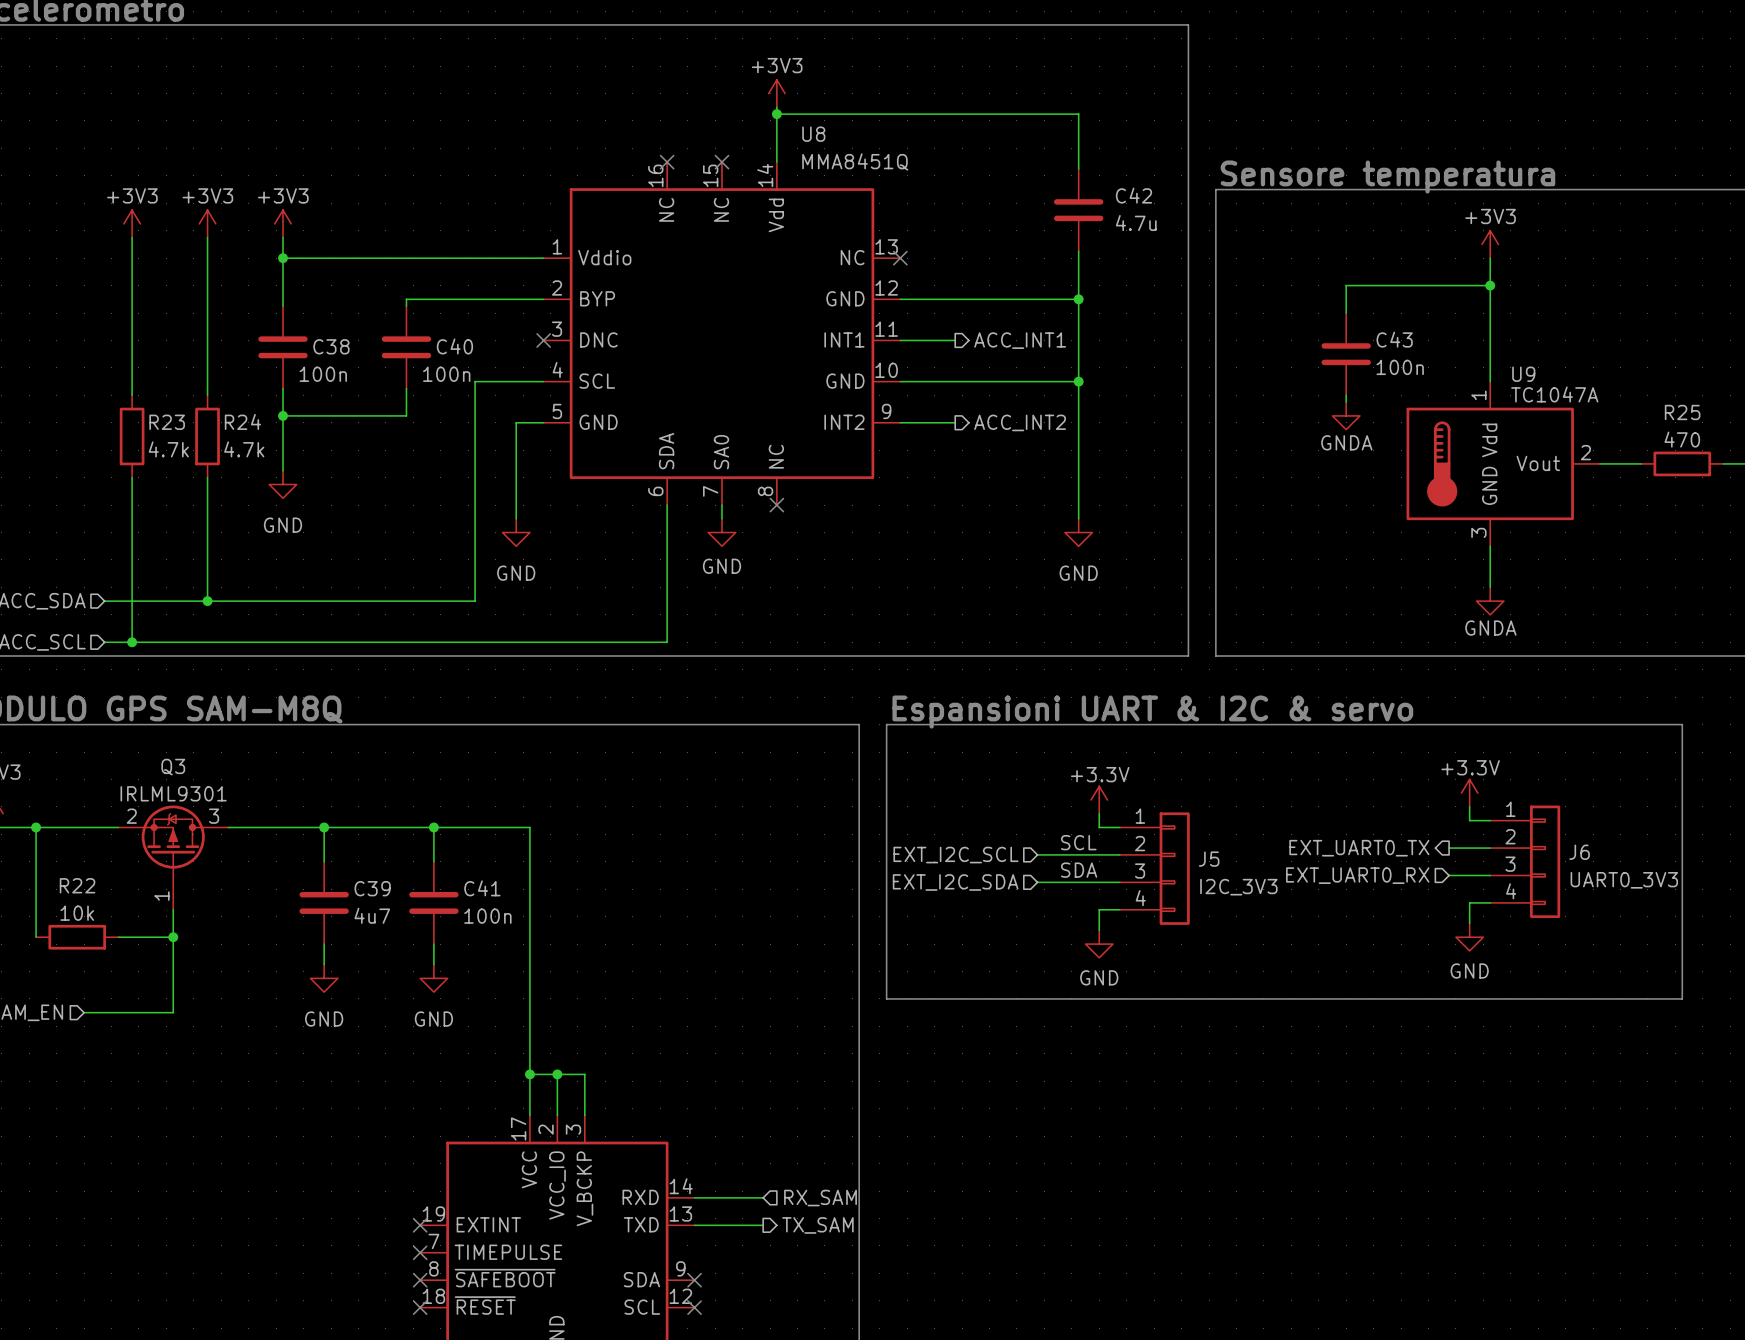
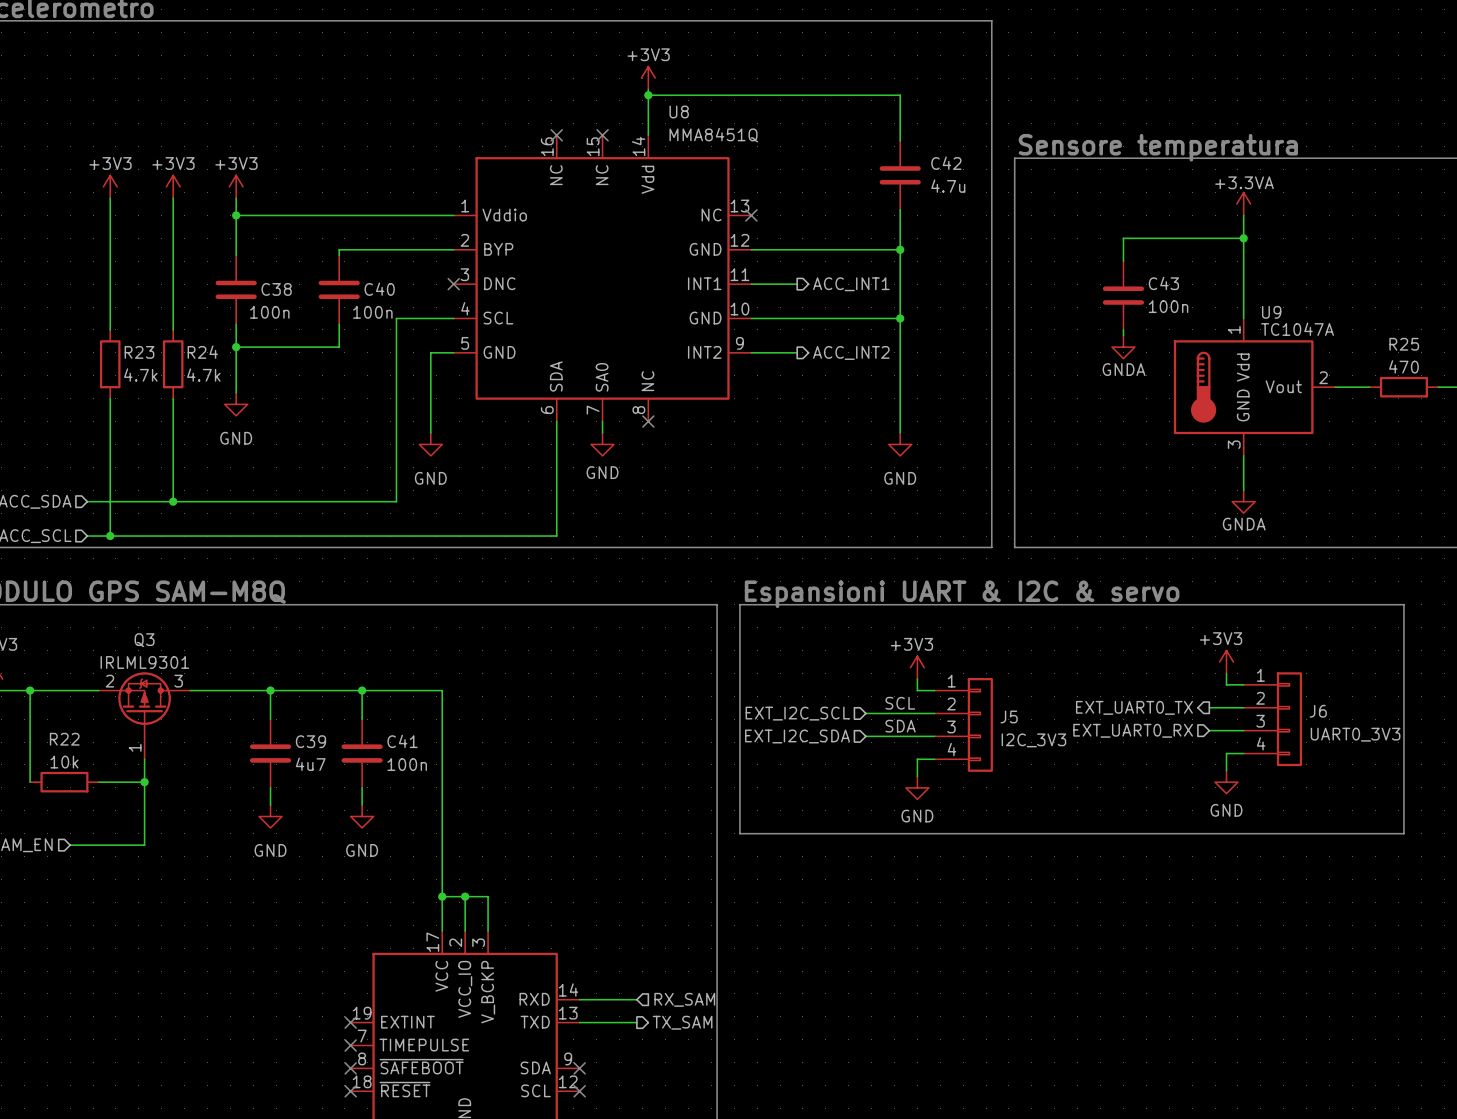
power symbol: +3V3 (1490, 244) -> +3.3VA (1243, 204)
power symbol: +3.3V (1469, 793) -> +3V3 (1226, 661)
power symbol: +3.3V (1099, 800) -> +3V3 (917, 667)

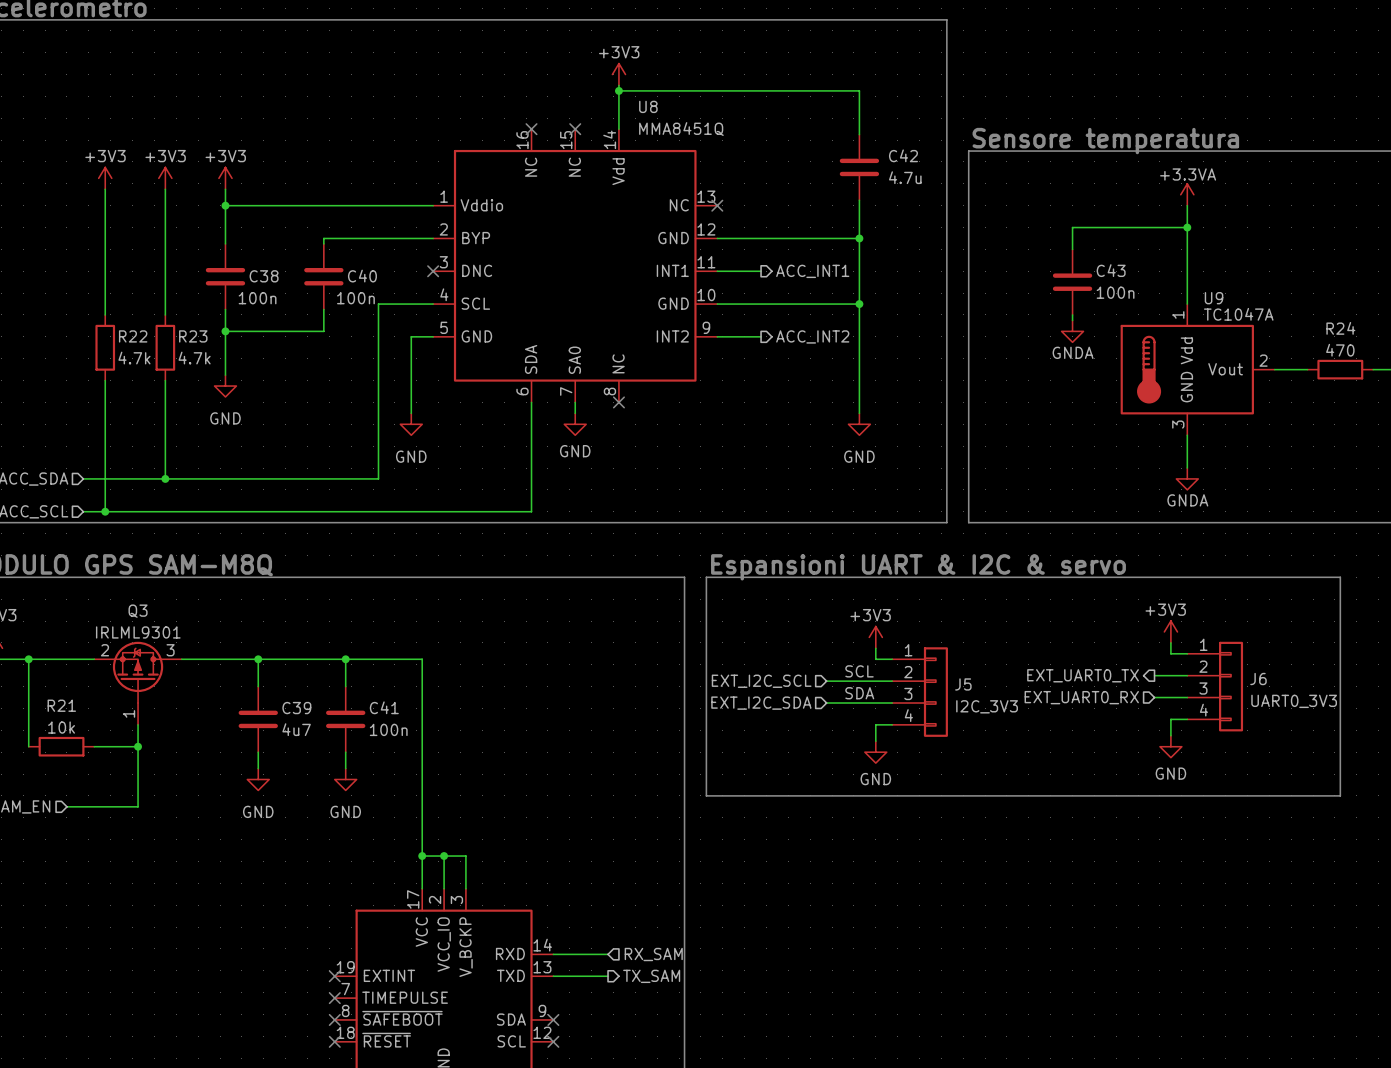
R25 name: R25 (1404, 344) -> R24 (1340, 328)
R23 name: R23 (139, 352) -> R22 (133, 336)
R24 name: R24 (202, 352) -> R23 (193, 336)
R22 name: R22 (64, 739) -> R21 (61, 705)

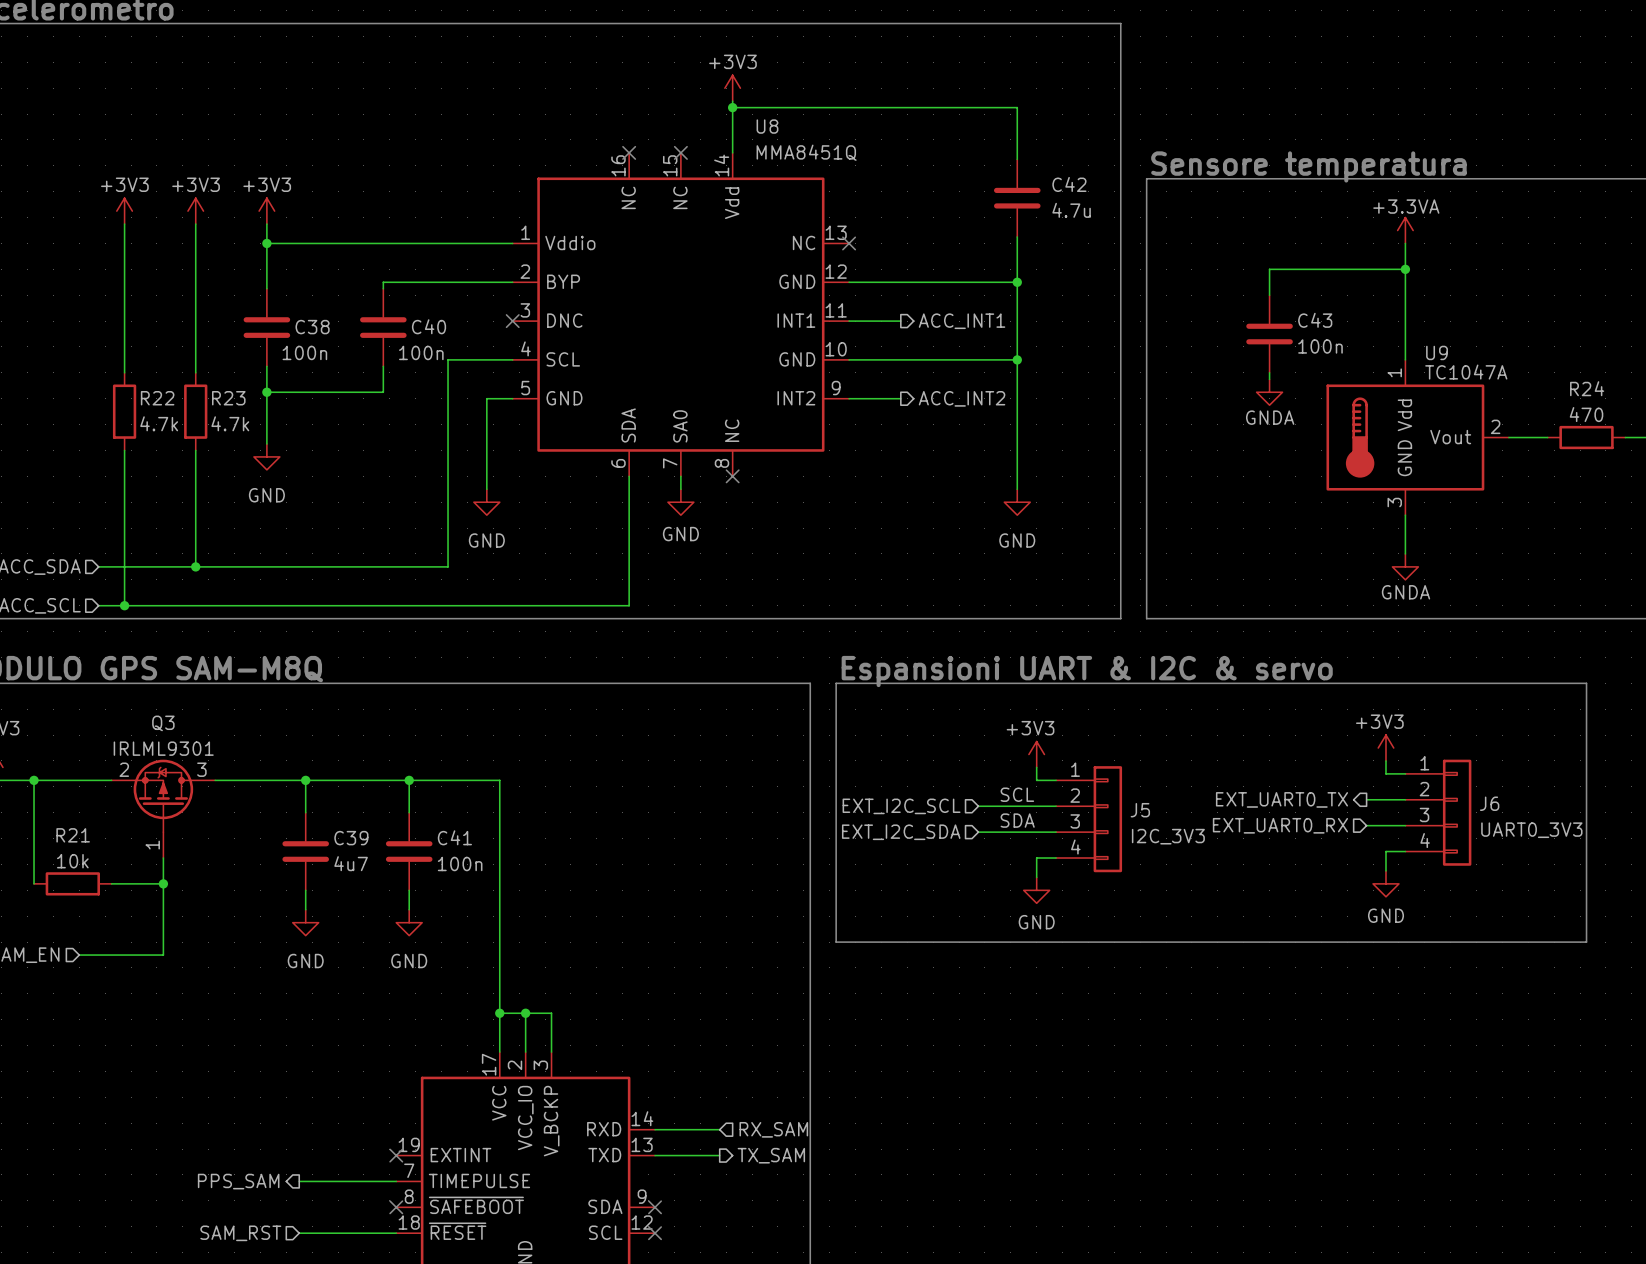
hierarchical label: none -> PPS_SAM (238, 1181)
wire: none -> (299, 1181) (396, 1181)
no-connect mark: (334, 998) -> none
hierarchical label: none -> SAM_RST (240, 1233)
wire: none -> (299, 1233) (396, 1233)
no-connect mark: (334, 1041) -> none

